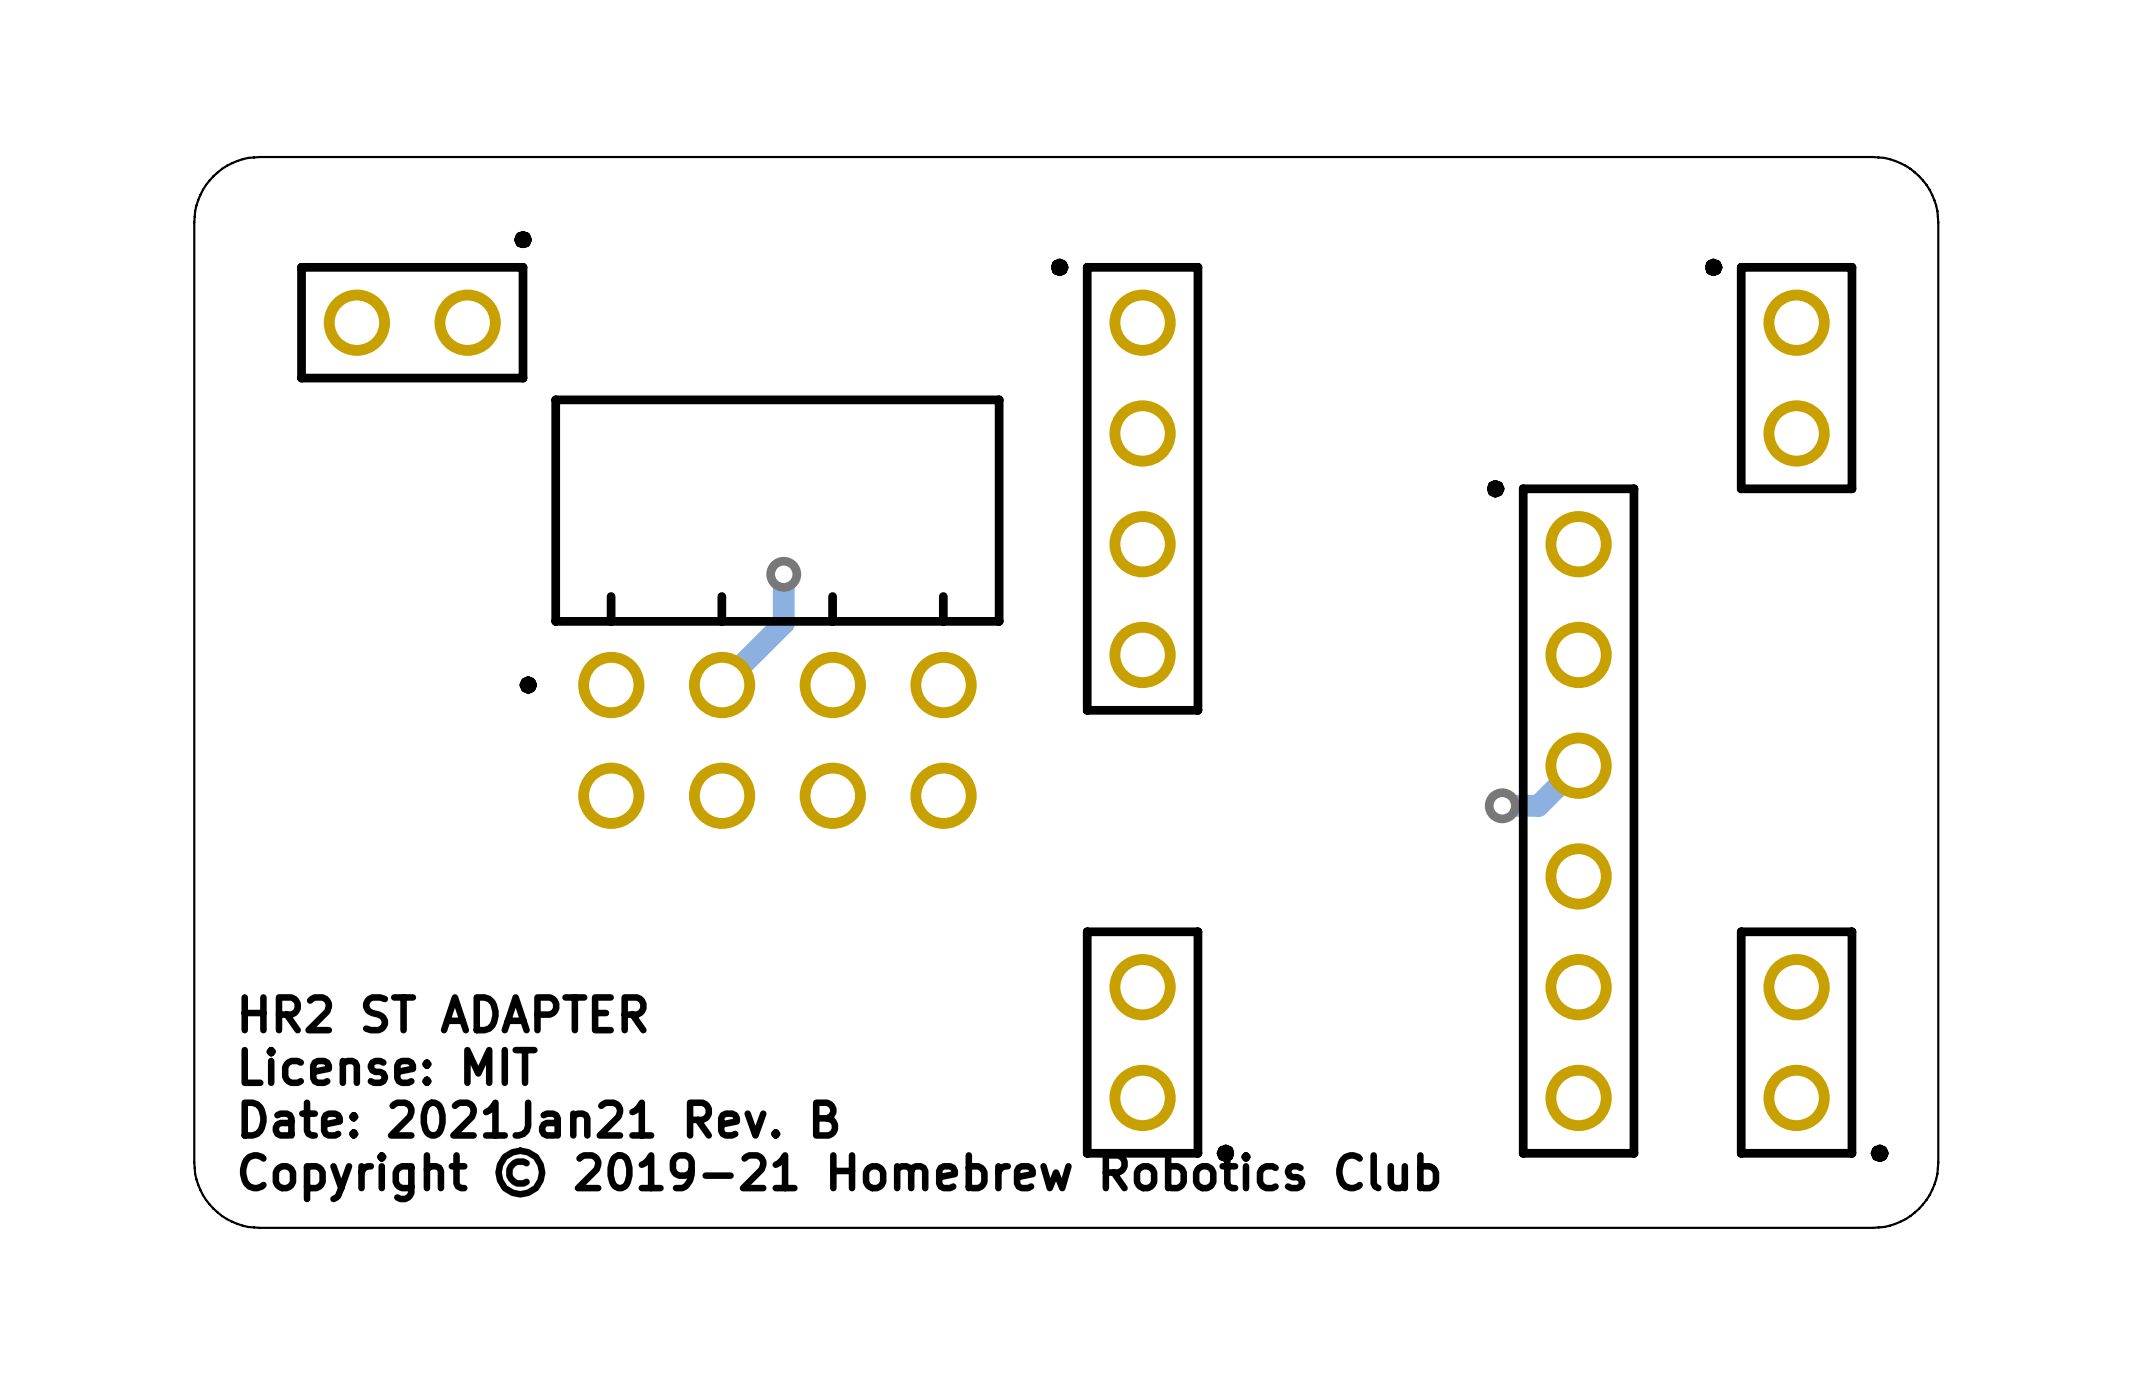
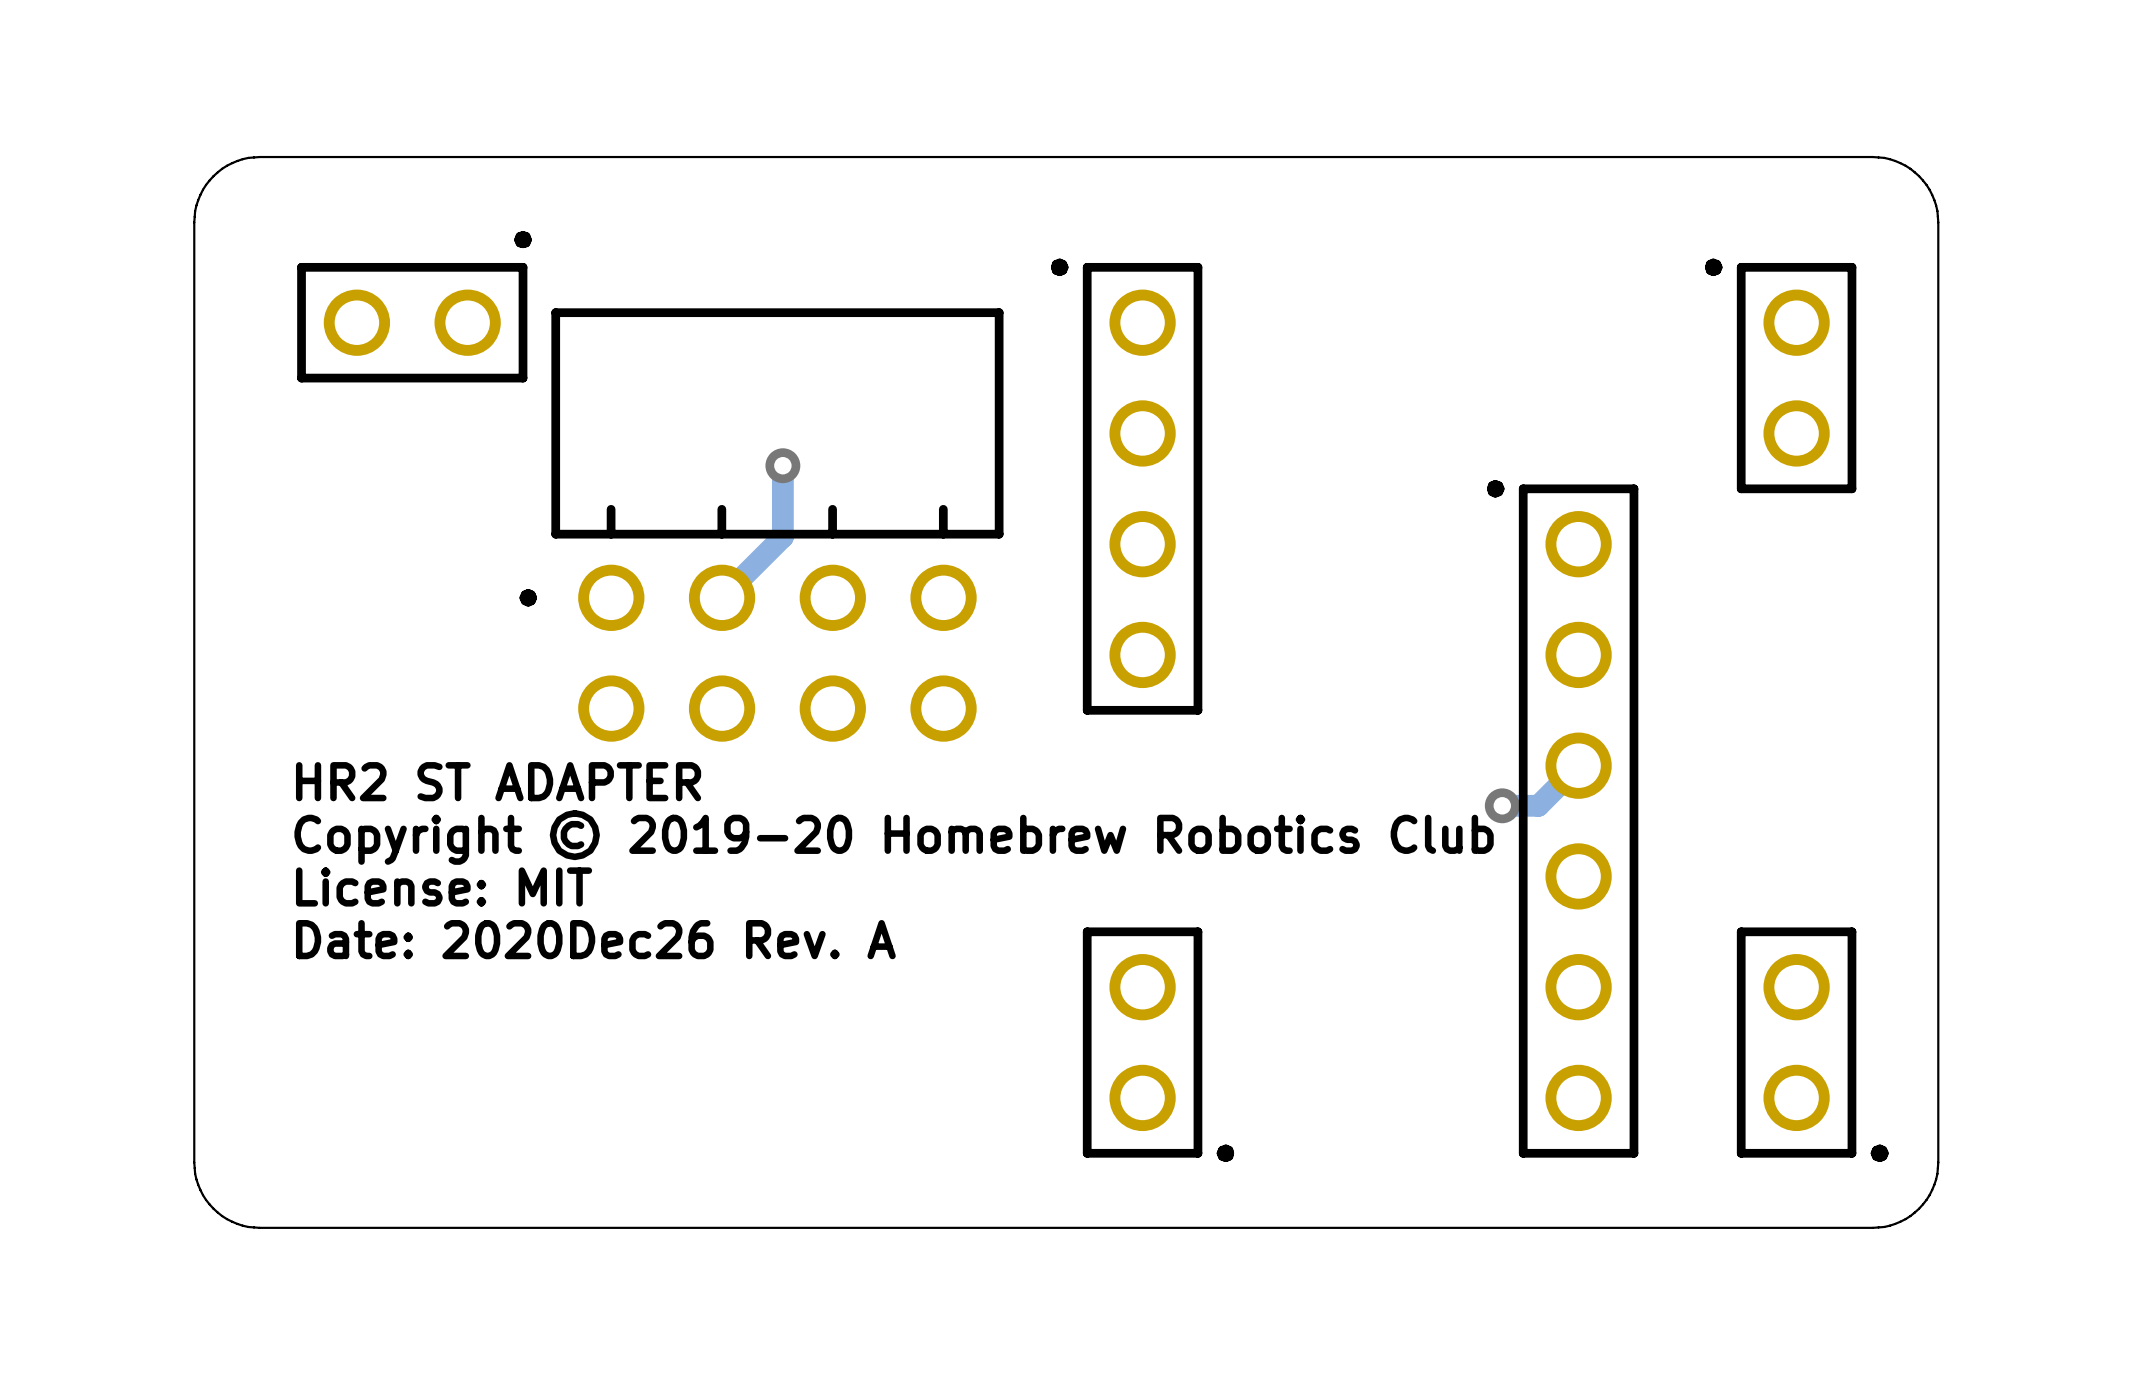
track: none -> (782, 465) (782, 537) (722, 597)
track: (783, 574) (783, 623) (722, 685) -> none
via position: (783, 574) -> (782, 465)
part position: (761, 612) -> (761, 525)
text: none -> Copyright © 2019-20 Homebrew Robotics Club (894, 837)
text: none -> Date: 2020Dec26 Rev. A (595, 939)
text position: HR2 ST ADAPTER (444, 1013) -> HR2 ST ADAPTER (498, 781)
text position: License: MIT (389, 1066) -> License: MIT (444, 886)
text: Date: 2021Jan21 Rev. B (539, 1119) -> none
text: Copyright © 2019-21 Homebrew Robotics Club (839, 1174) -> none

